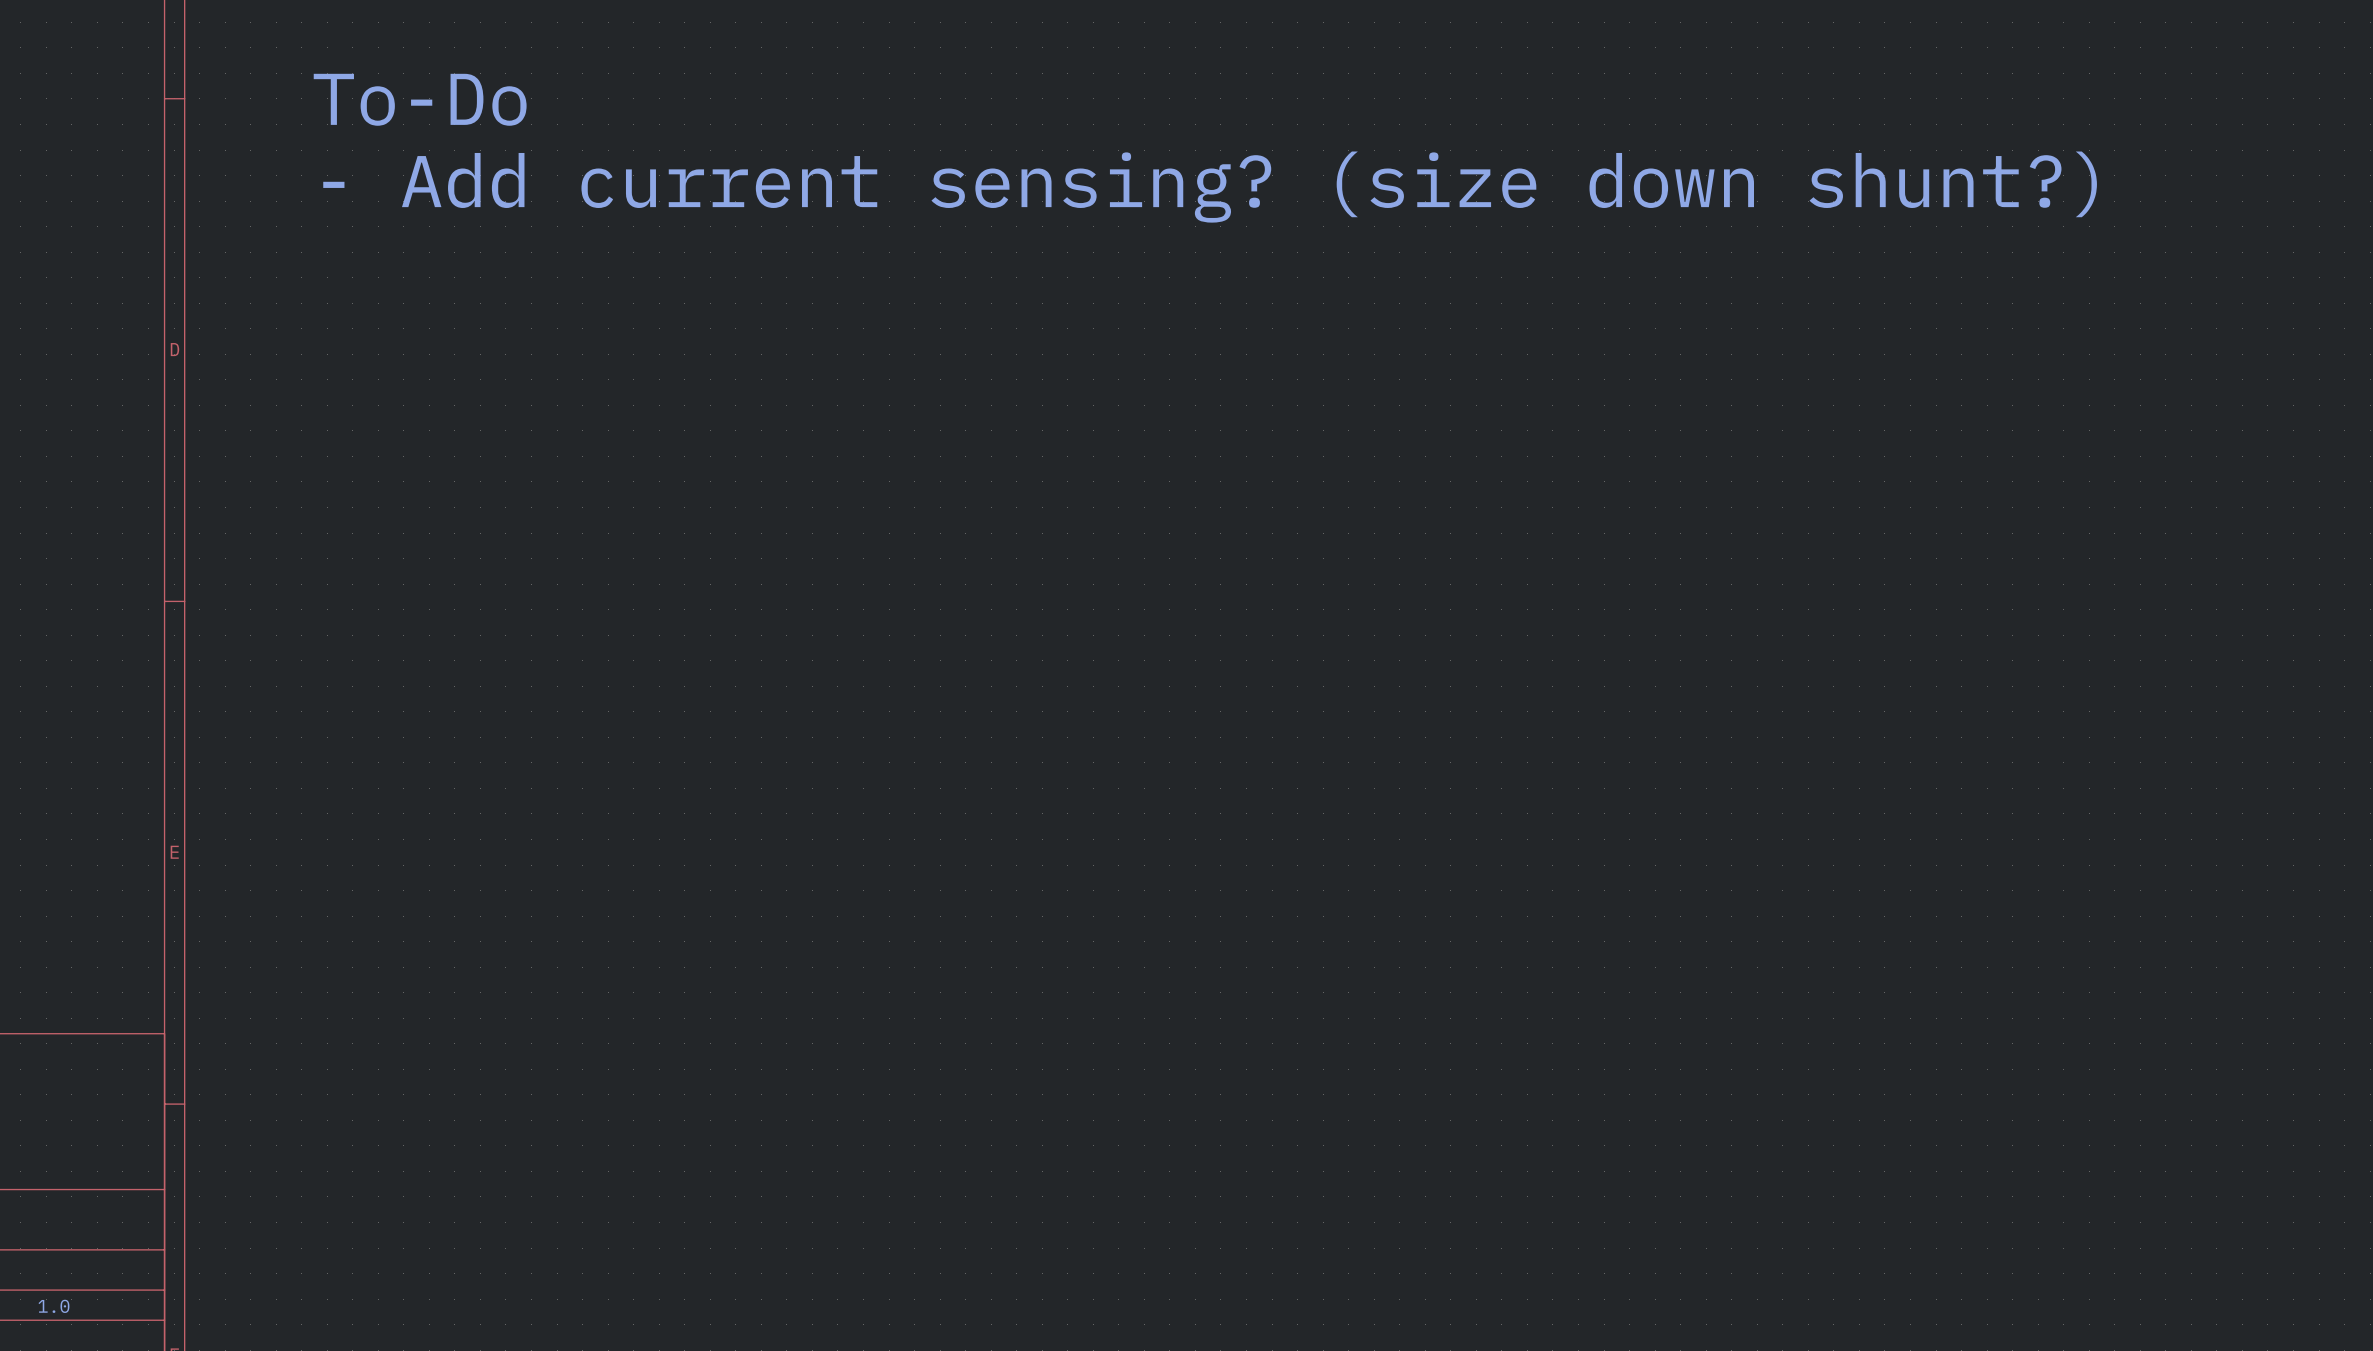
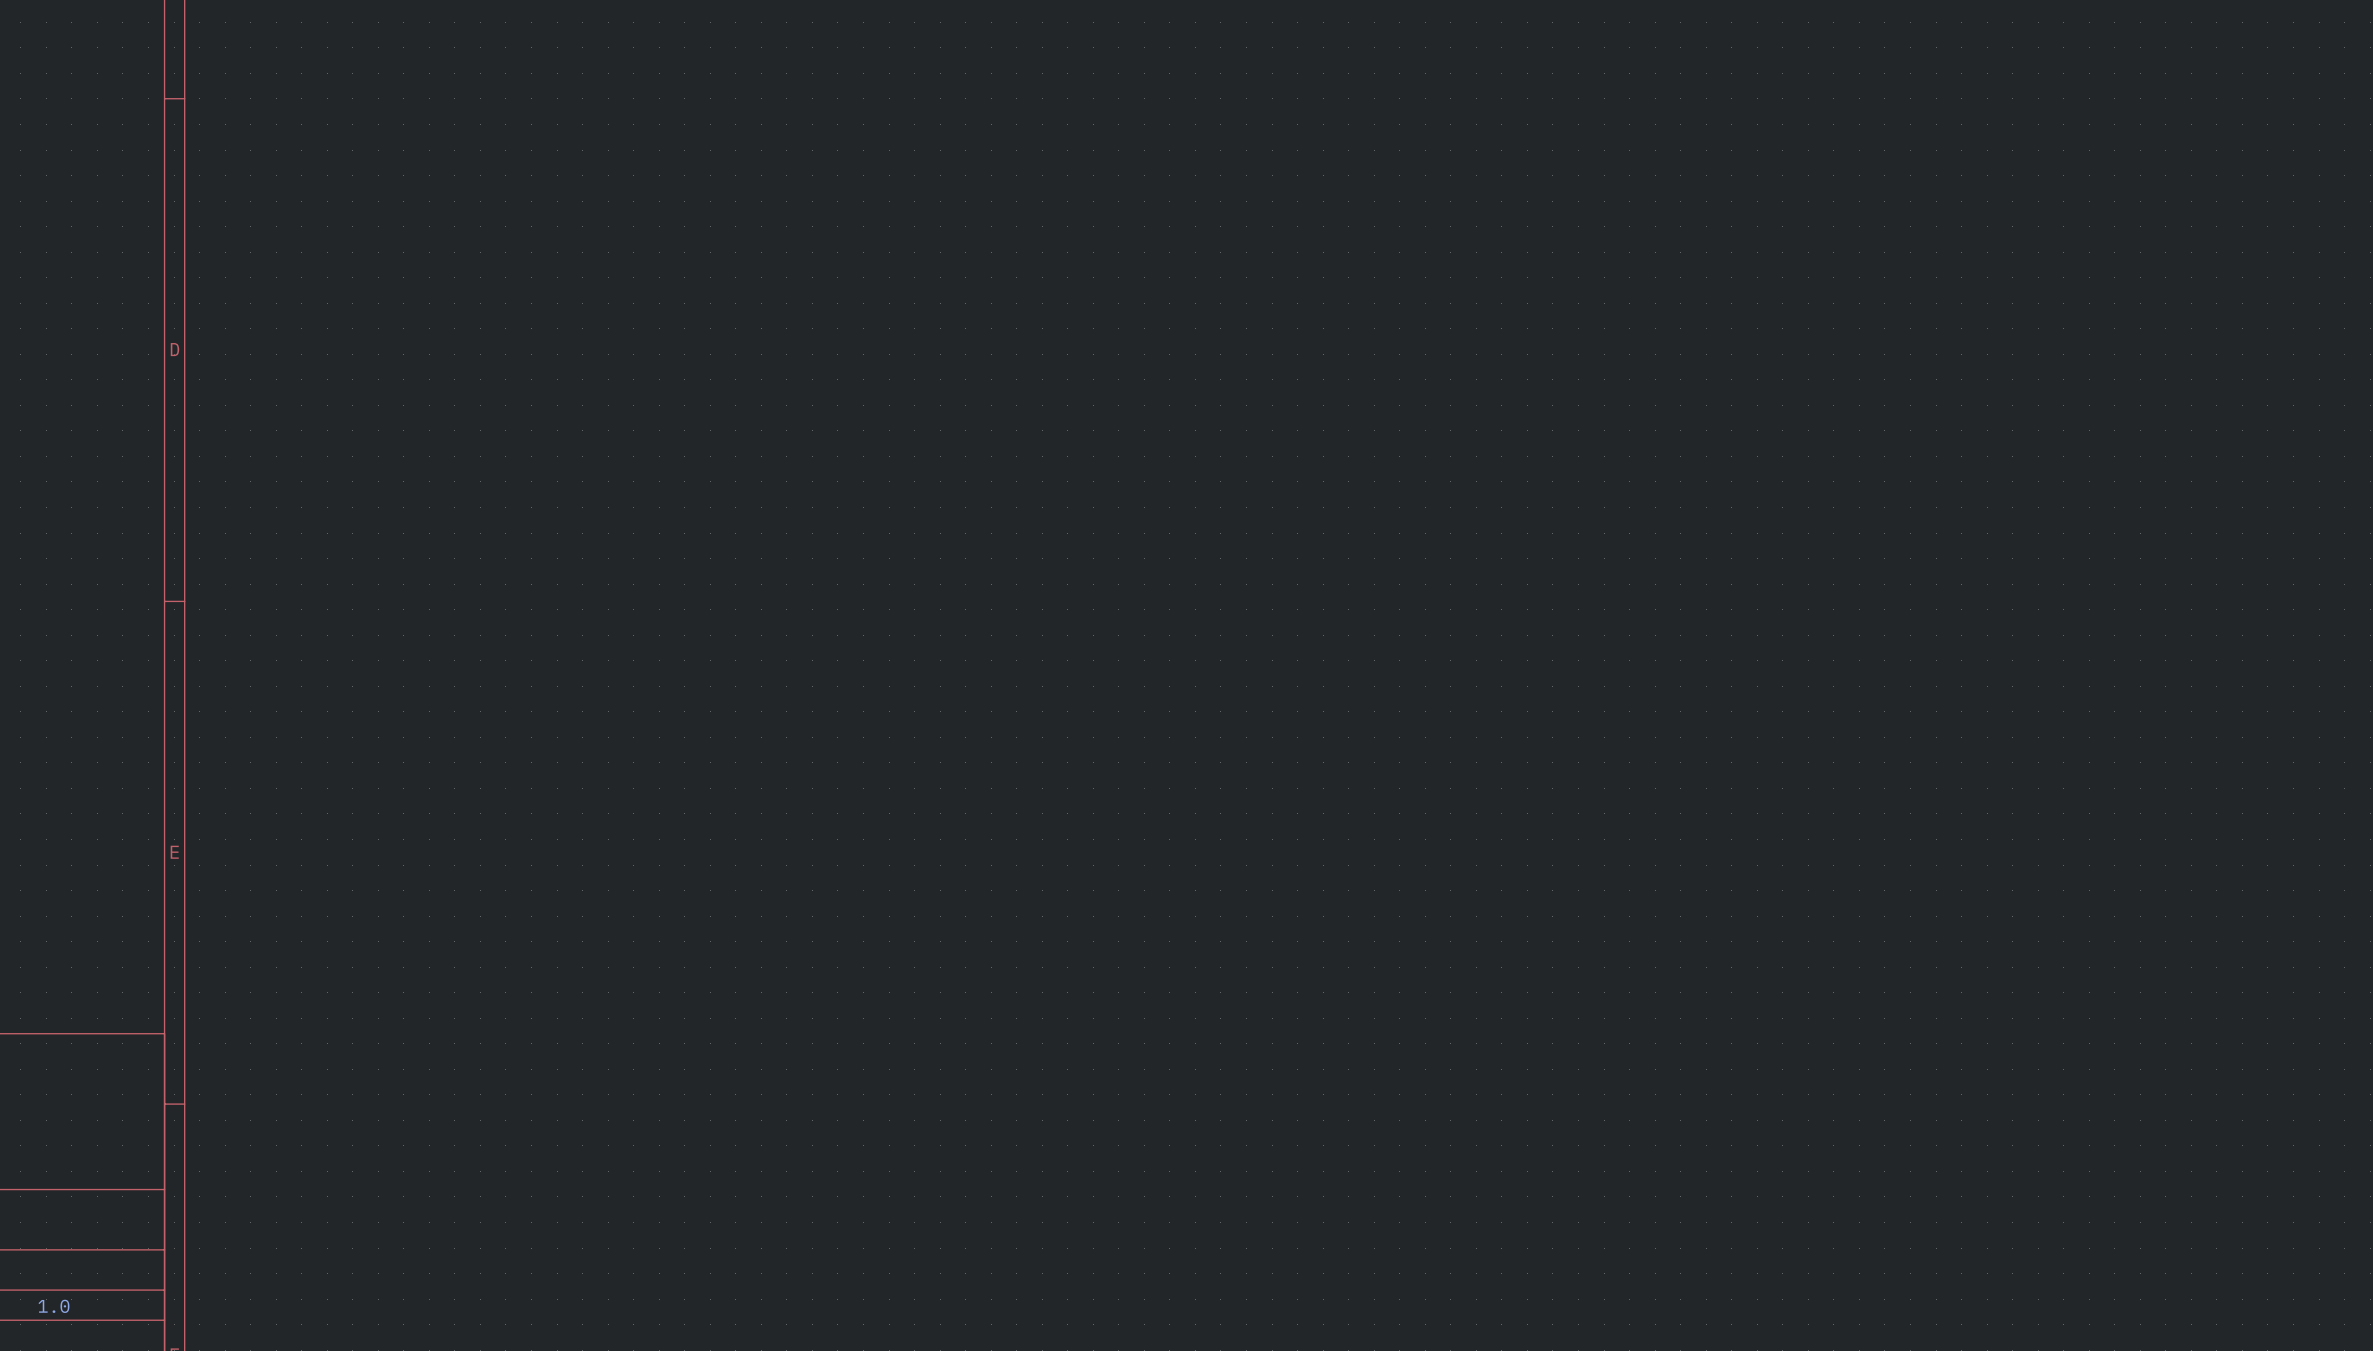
text: To-Do (420, 99) -> none
text: - Add current sensing? (size down shunt?) (1210, 187) -> none

